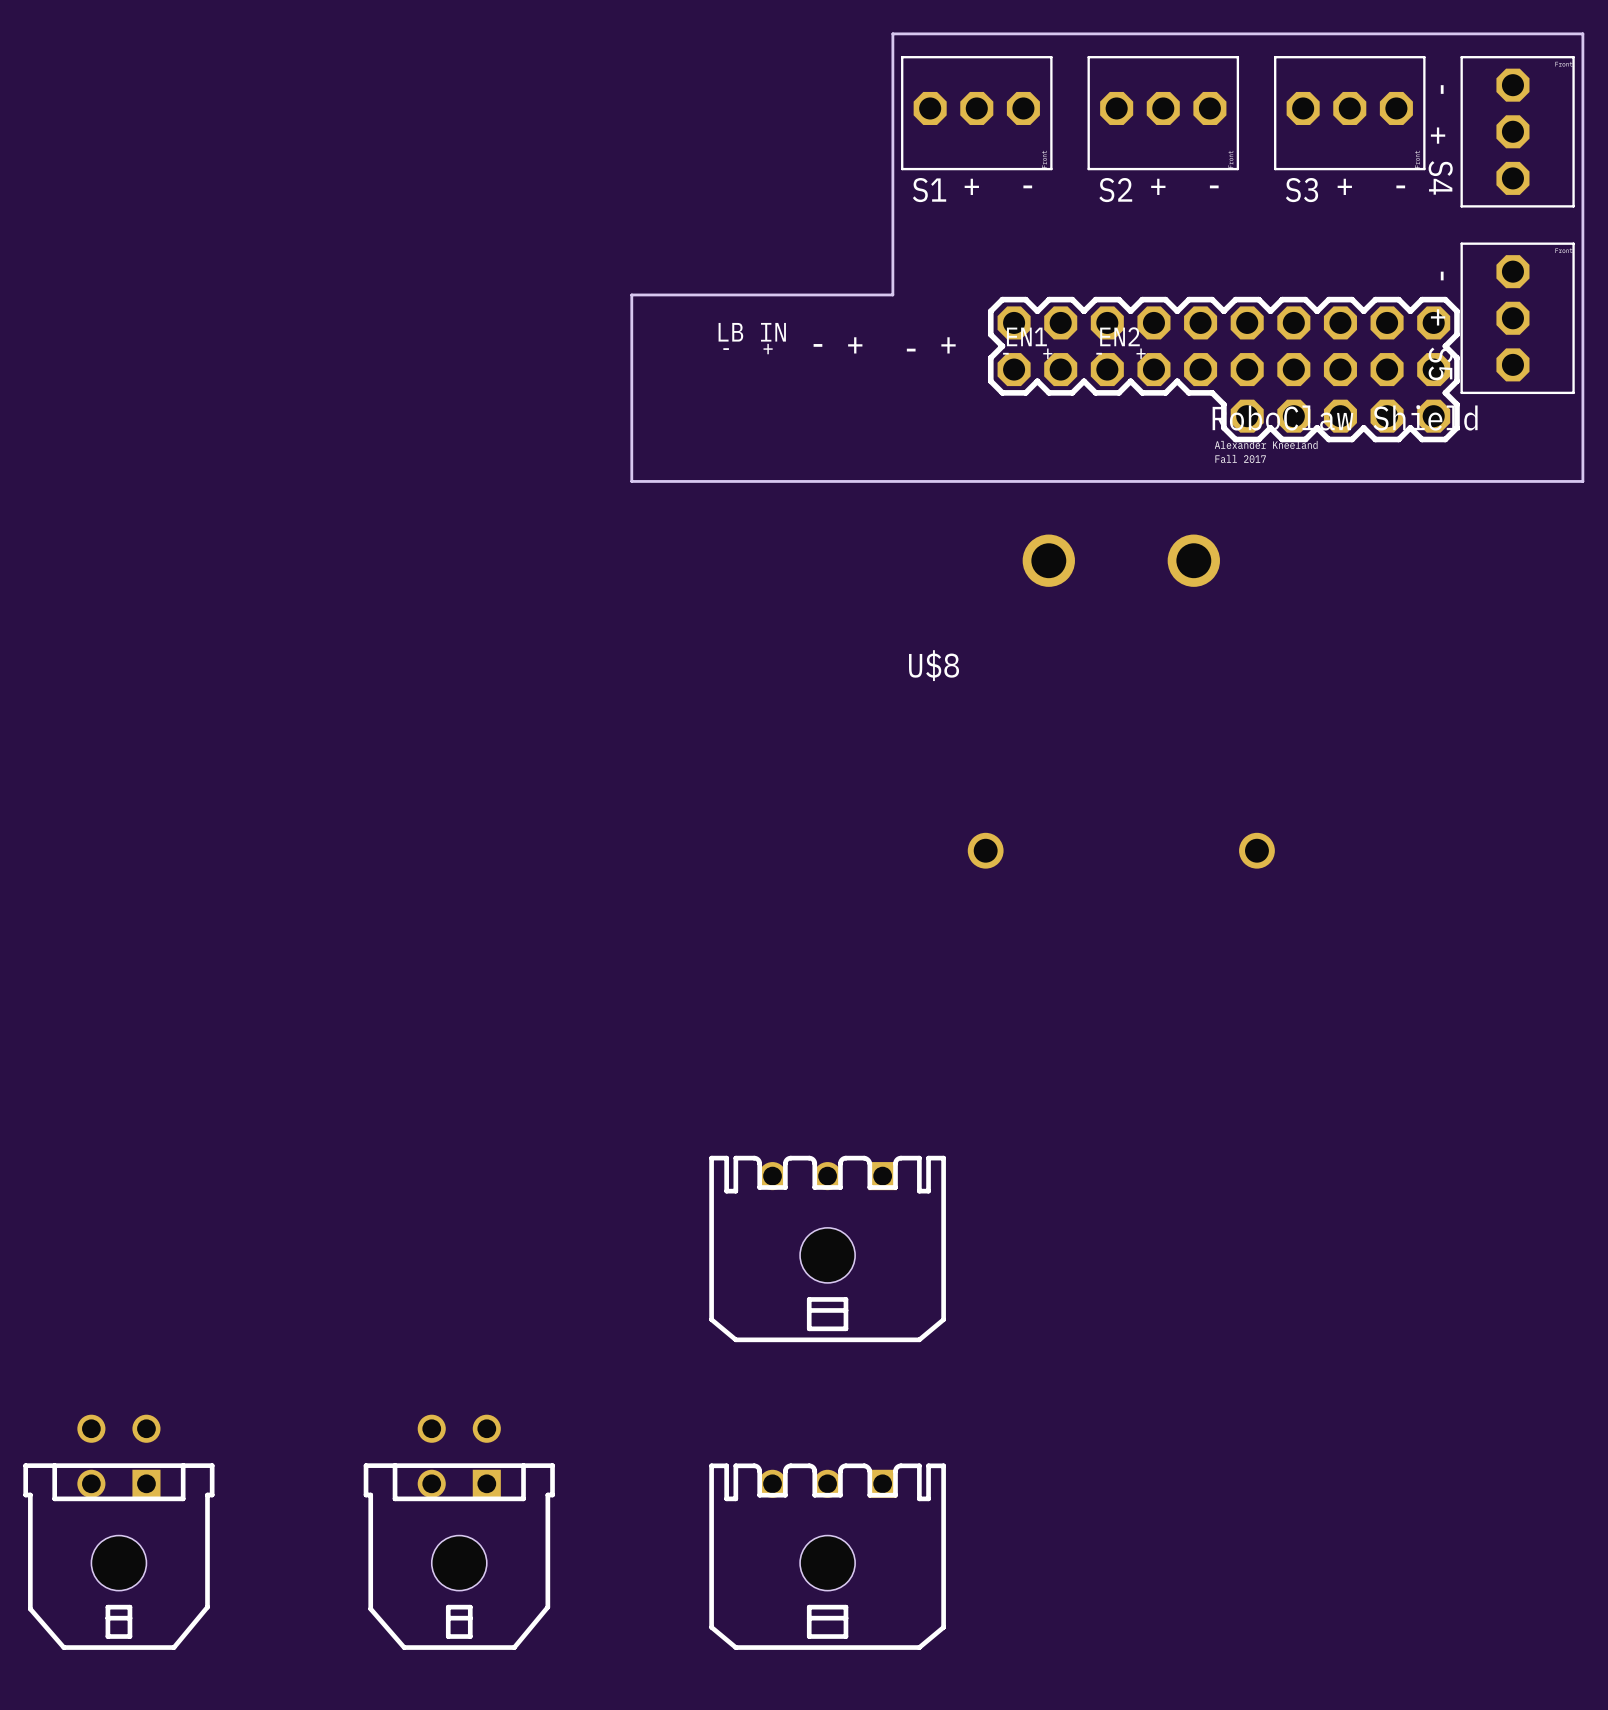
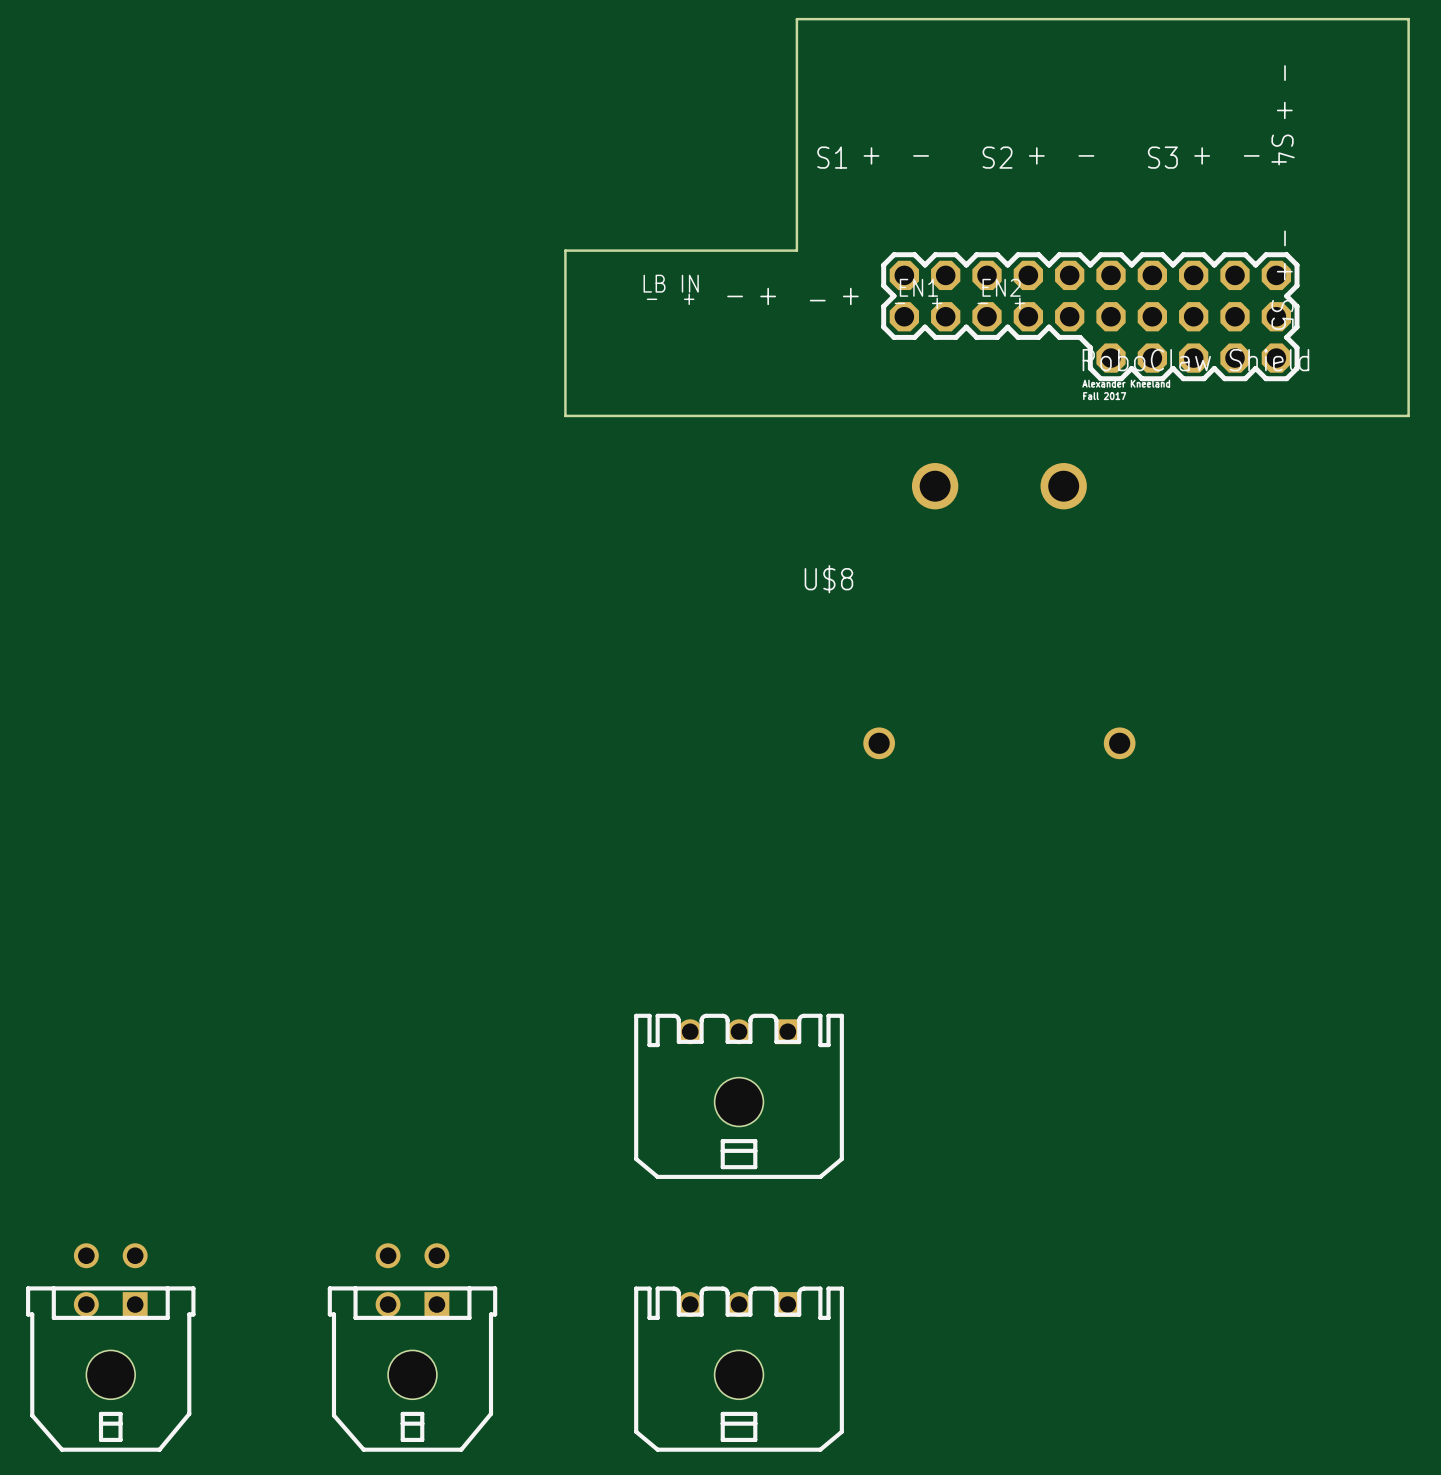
part: (976, 113) -> none
part: (1163, 113) -> none
part: (1349, 113) -> none
part: (1517, 131) -> none
part: (1517, 318) -> none

